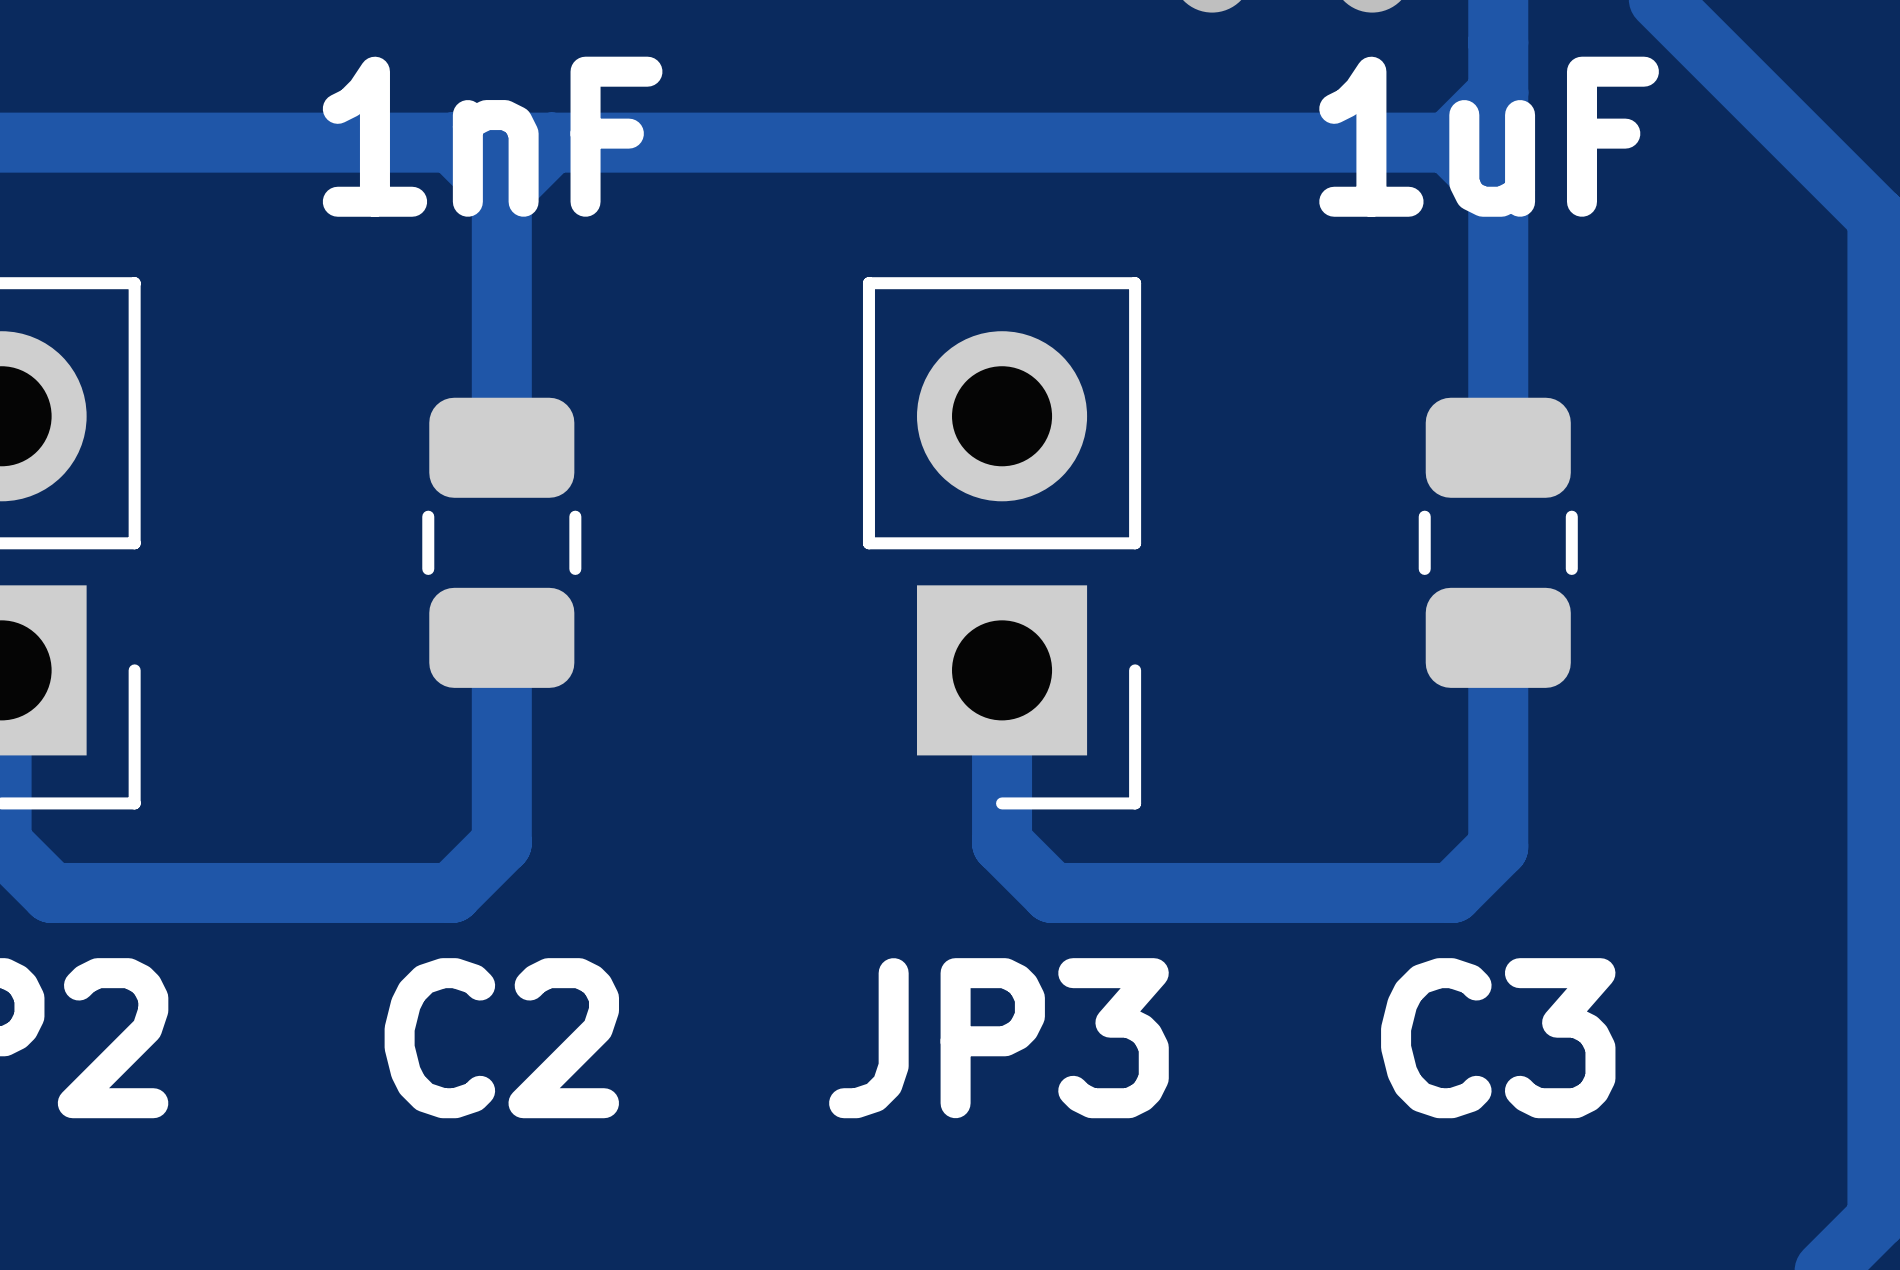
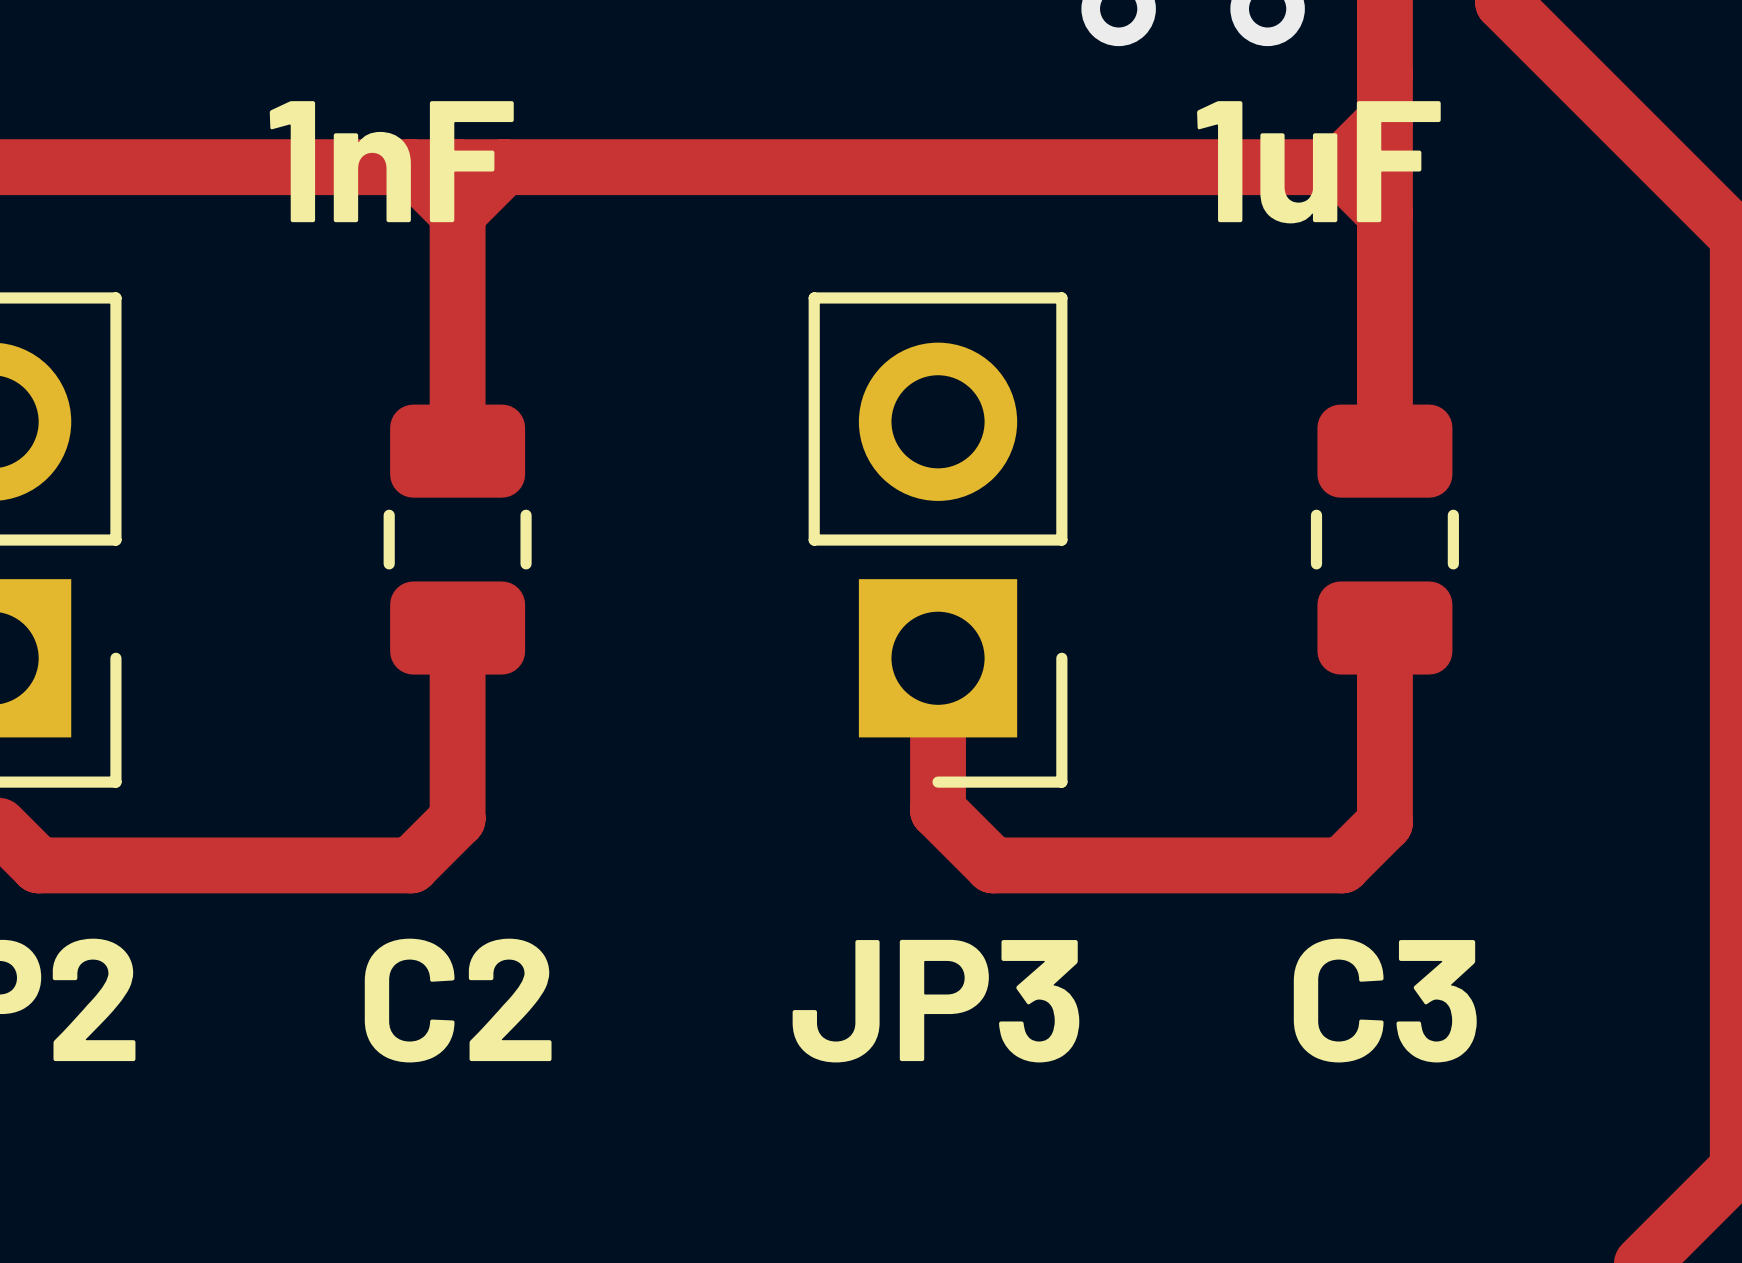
JP3 position: (1002, 543) -> (938, 540)
track: (1002, 670) (1002, 842) (1052, 892) (1077, 892) -> (938, 658) (938, 810) (992, 865)

